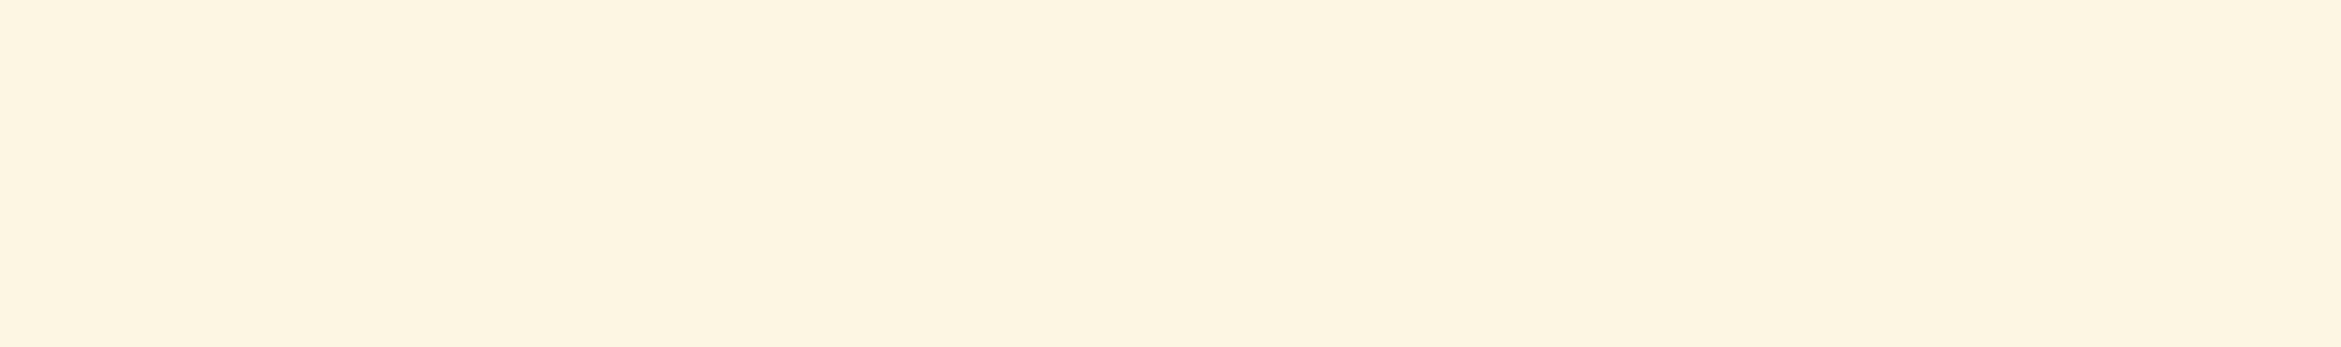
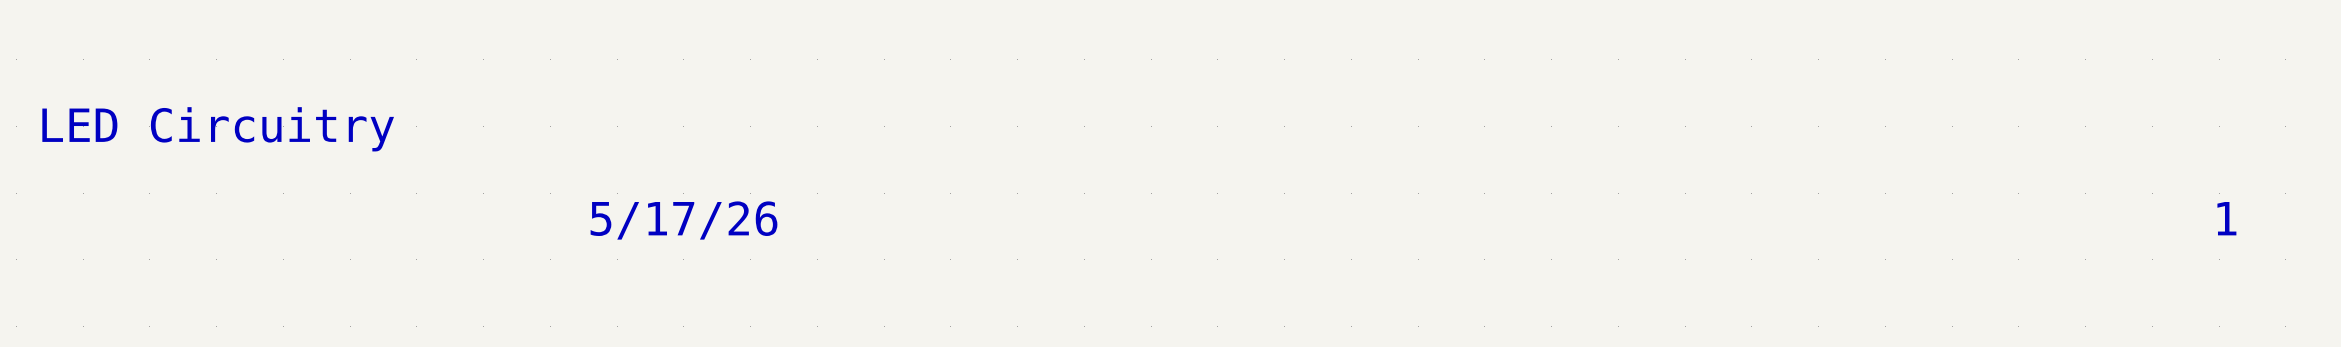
text: none -> LED Circuitry (218, 129)
text: none -> 1 (2226, 218)
text: none -> 5/17/26 (684, 220)

